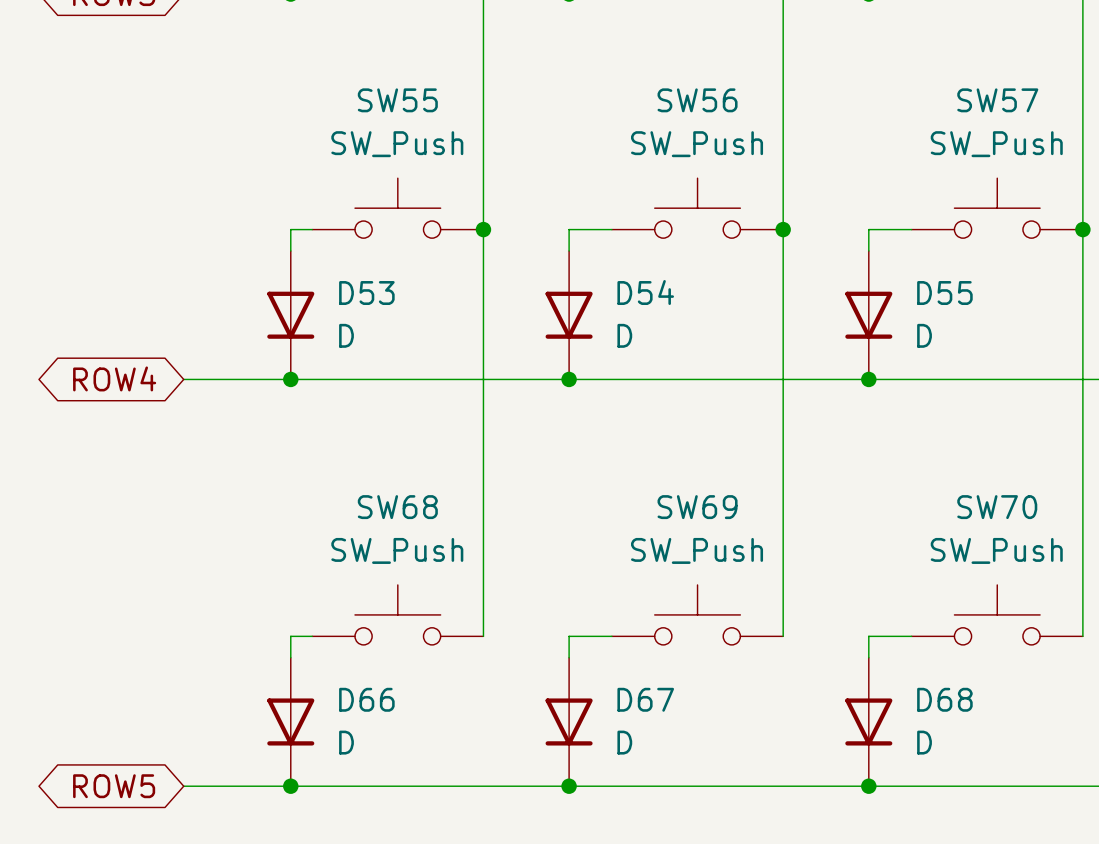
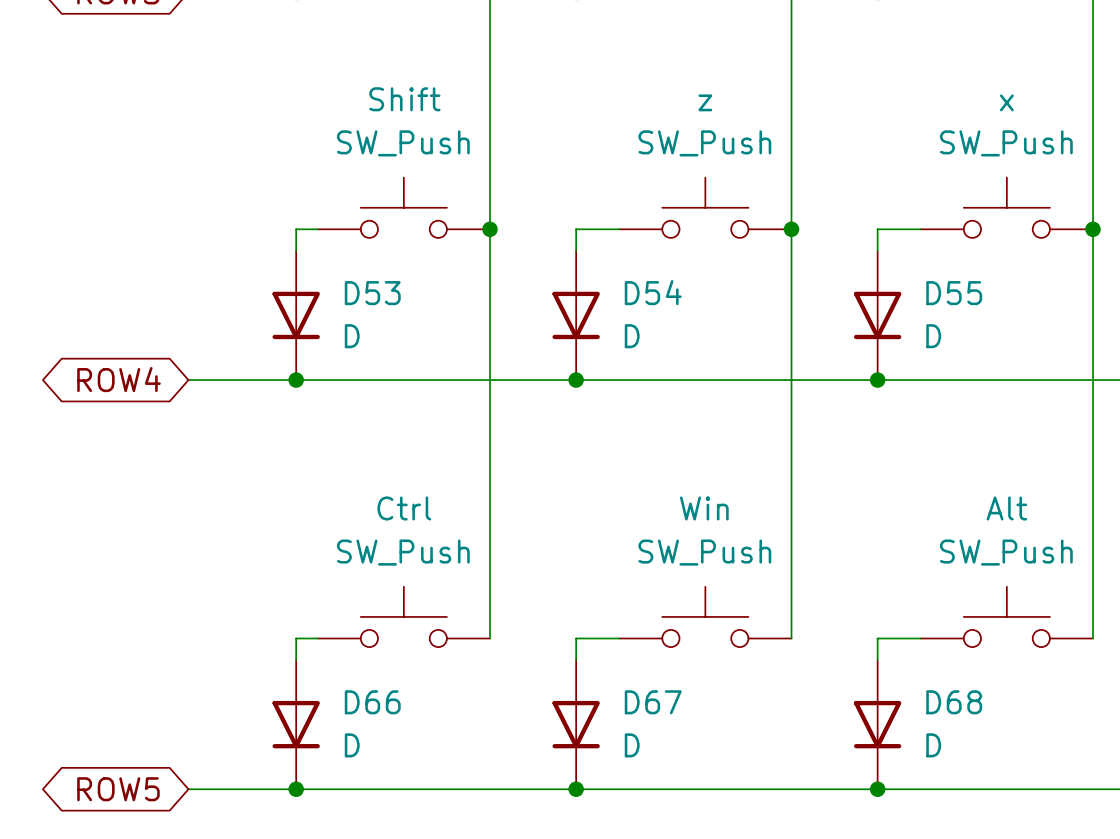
SW55 name: SW55 (397, 100) -> Shift (404, 99)
SW56 name: SW56 (697, 100) -> z (705, 102)
SW57 name: SW57 (997, 100) -> x (1006, 102)
SW68 name: SW68 (397, 507) -> Ctrl (404, 508)
SW69 name: SW69 (697, 507) -> Win (704, 508)
SW70 name: SW70 (997, 507) -> Alt (1006, 508)

